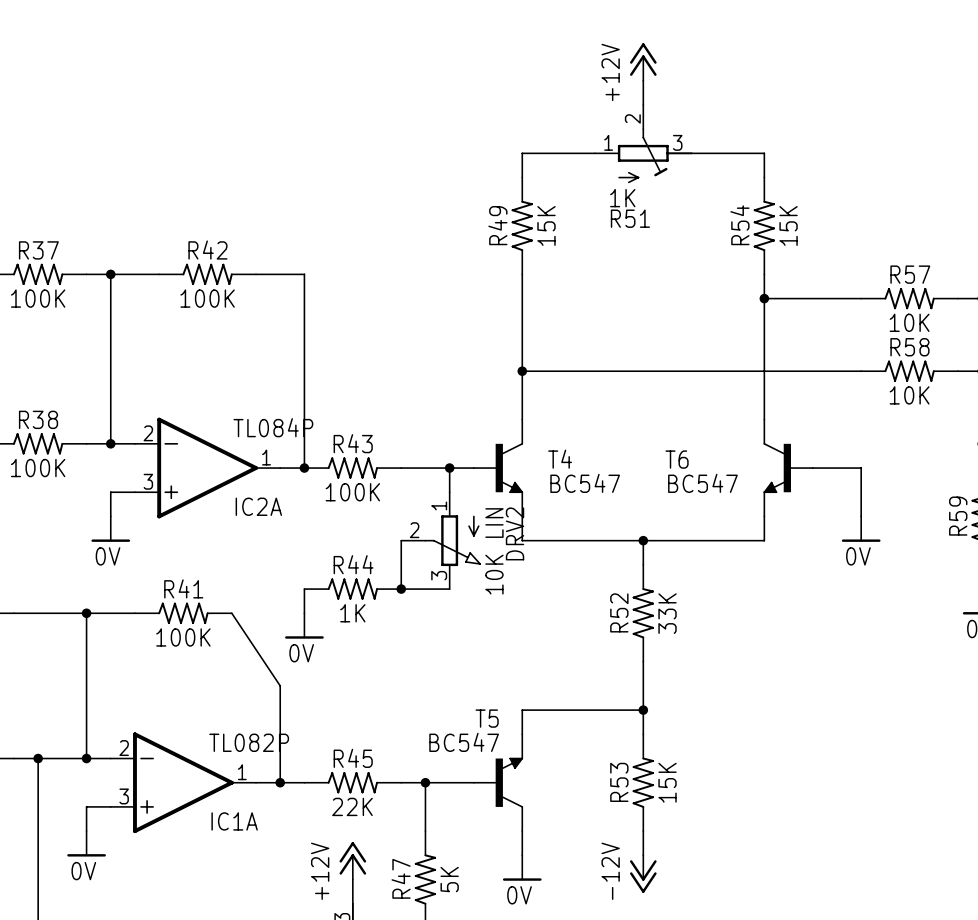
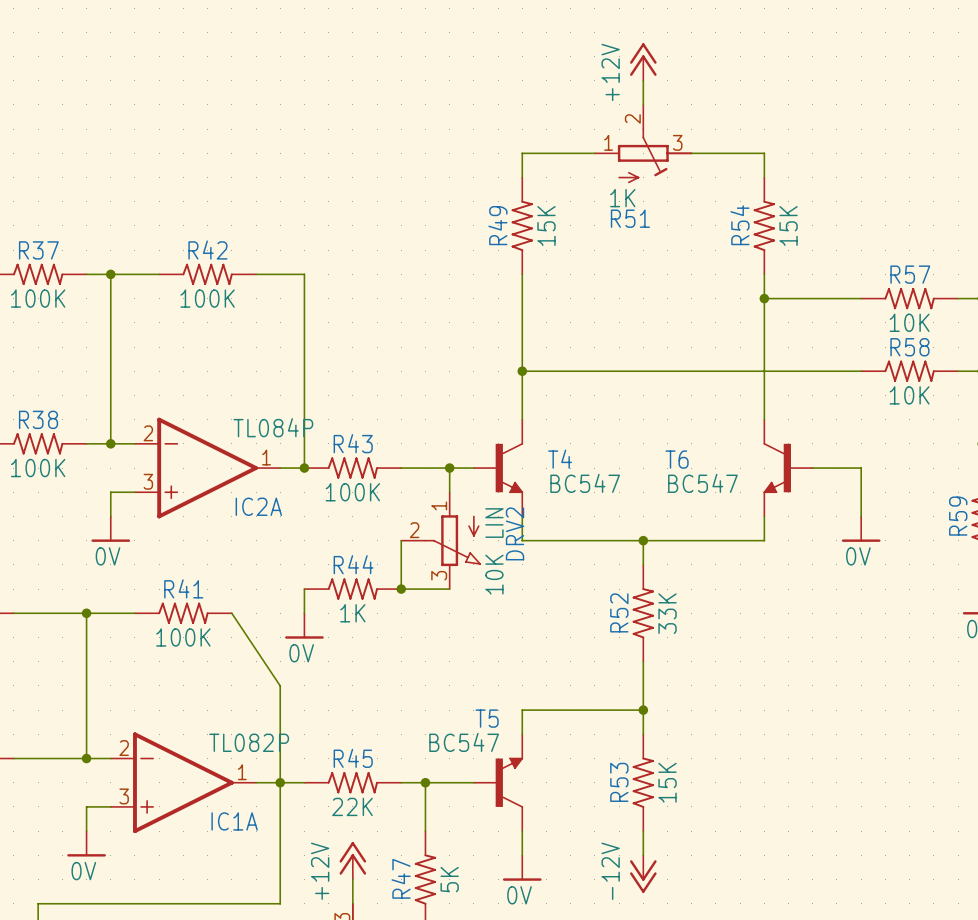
wire: (38, 758) (38, 903) -> (280, 782) (280, 903) (38, 903)
junction: (38, 758) -> none

